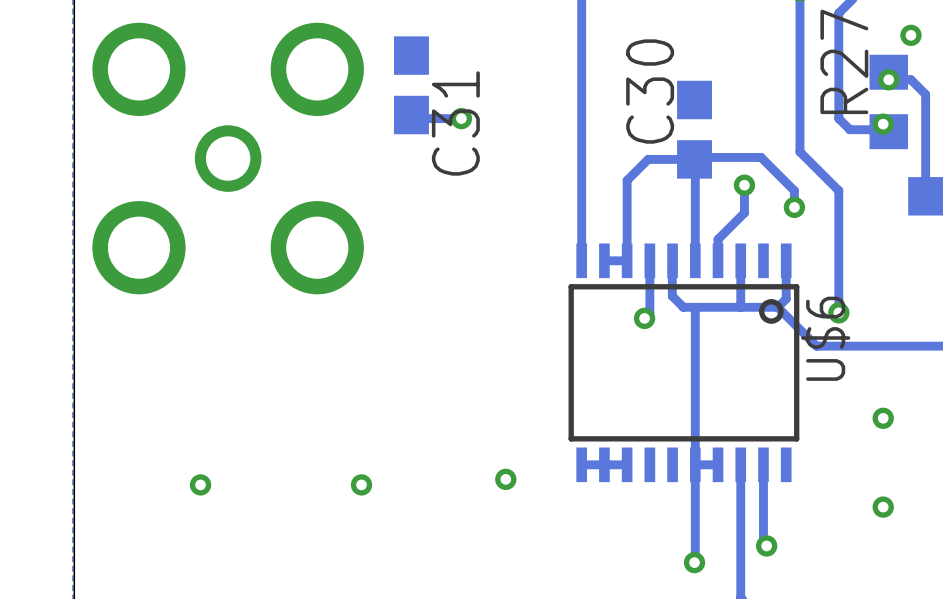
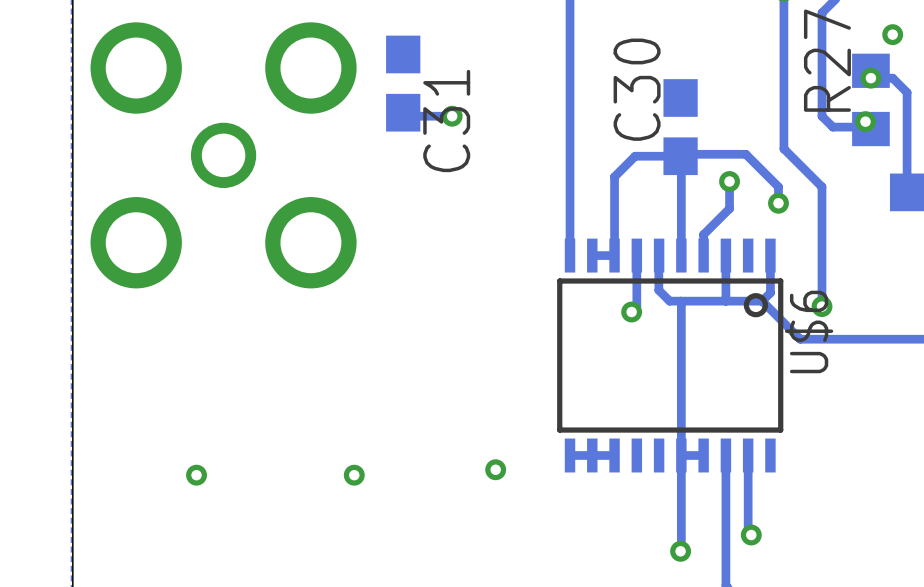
via: (883, 418) -> none
via: (883, 507) -> none

